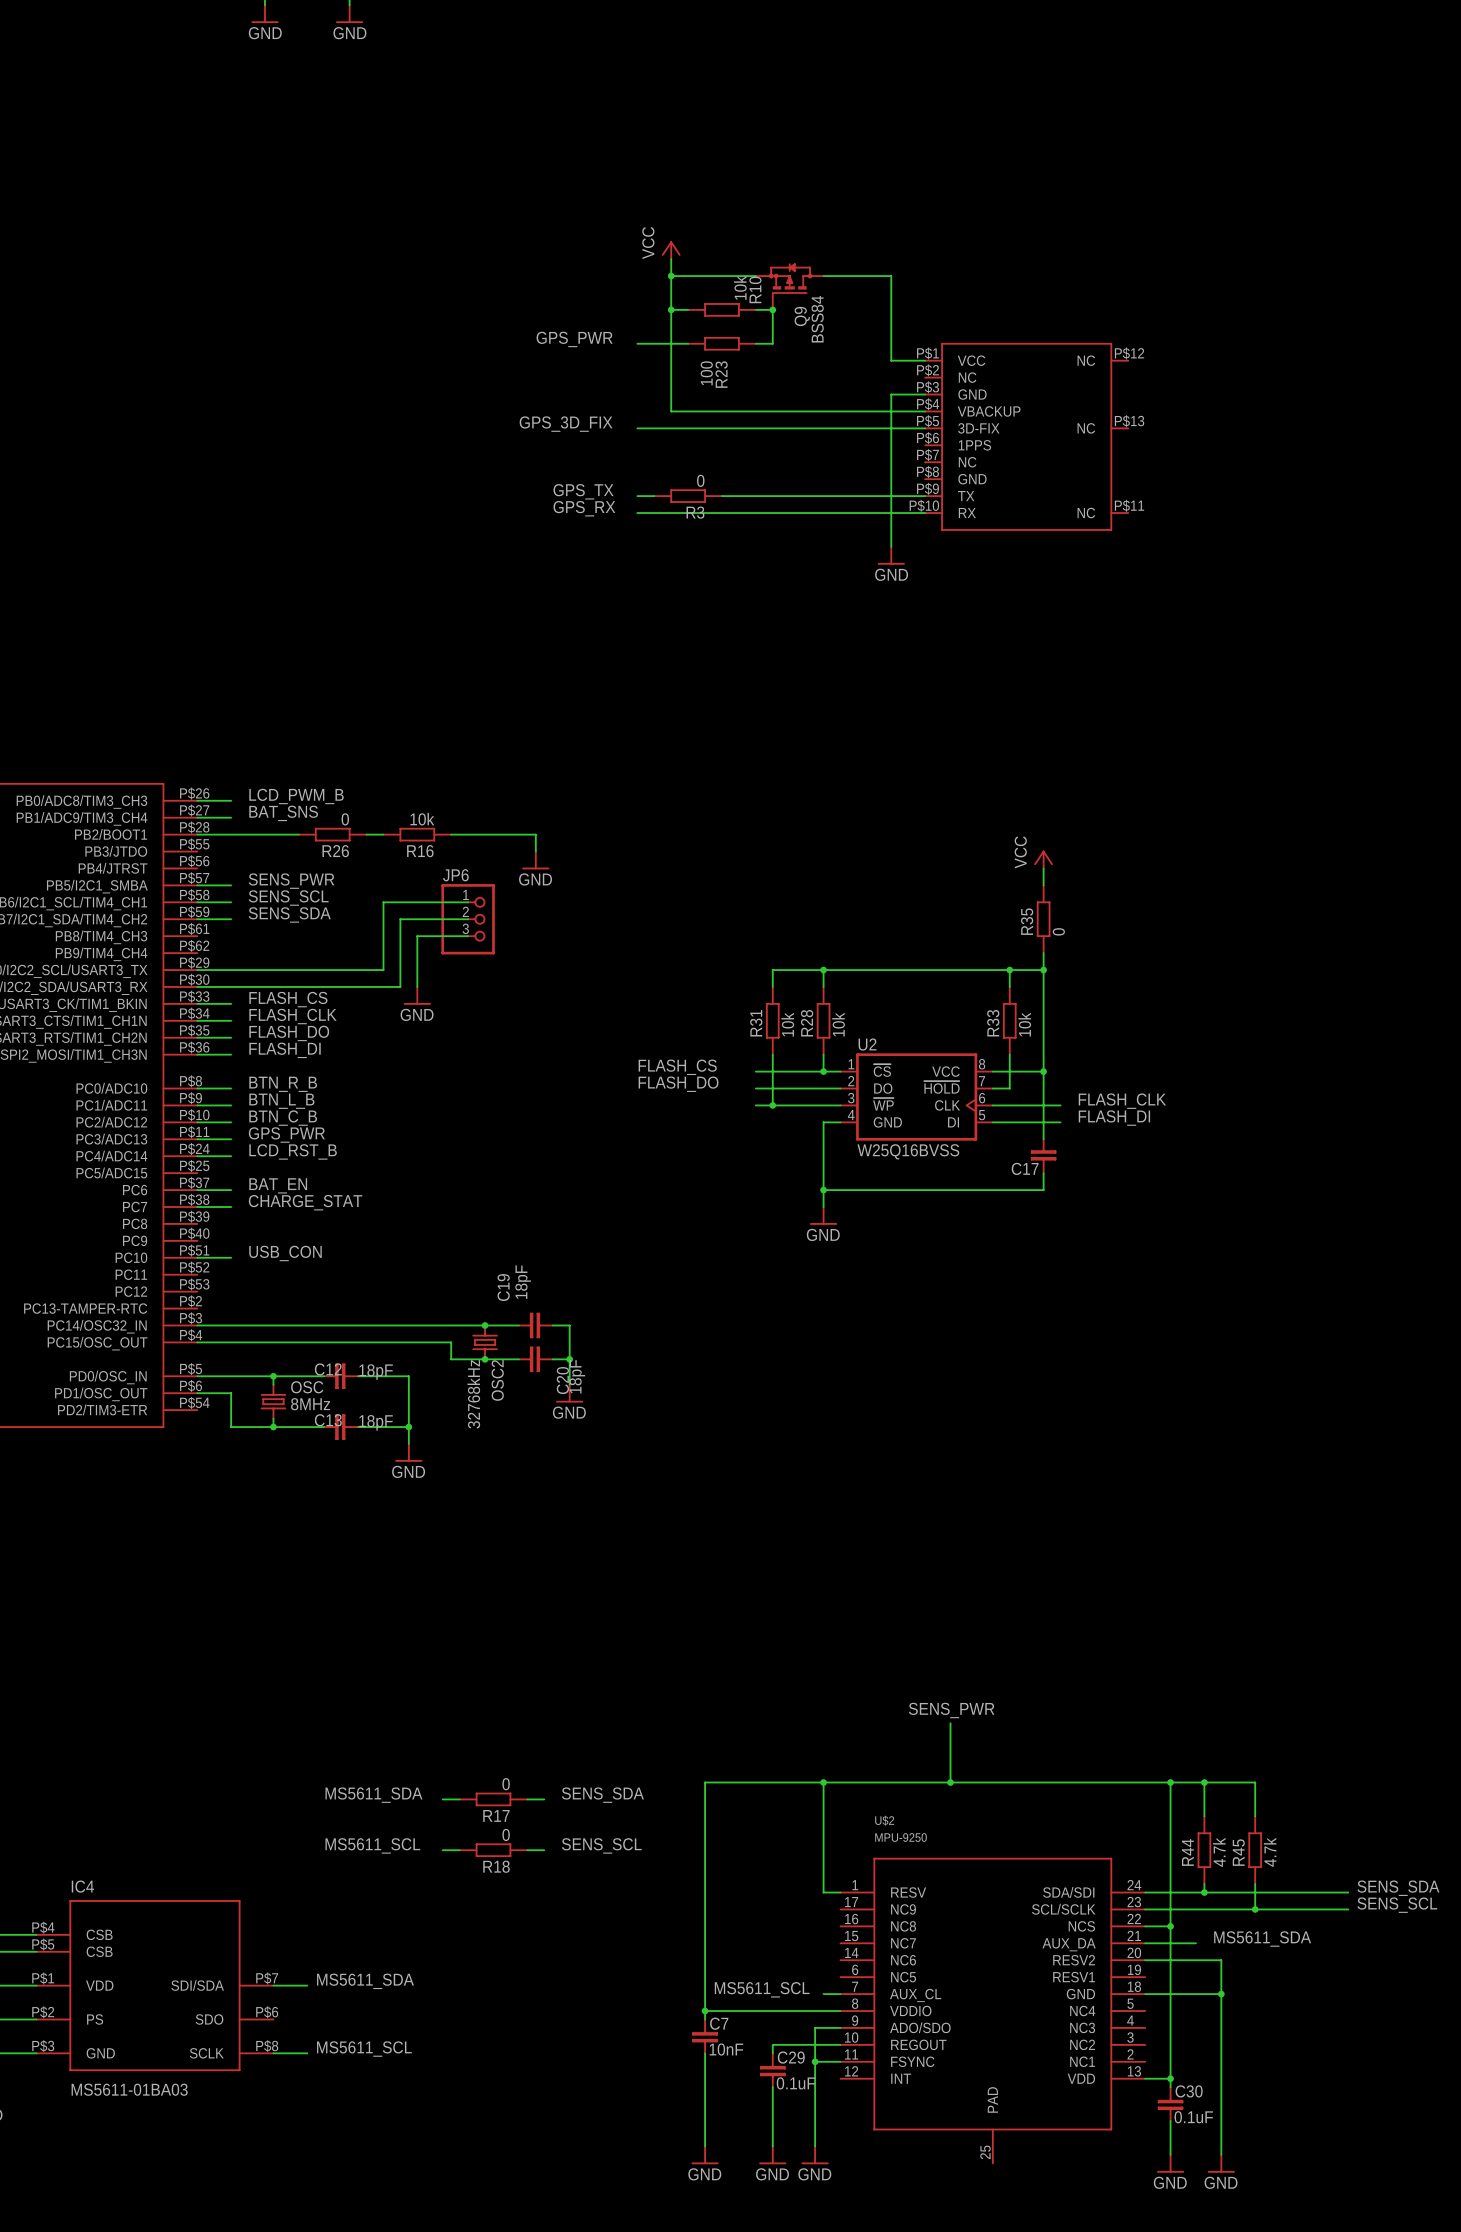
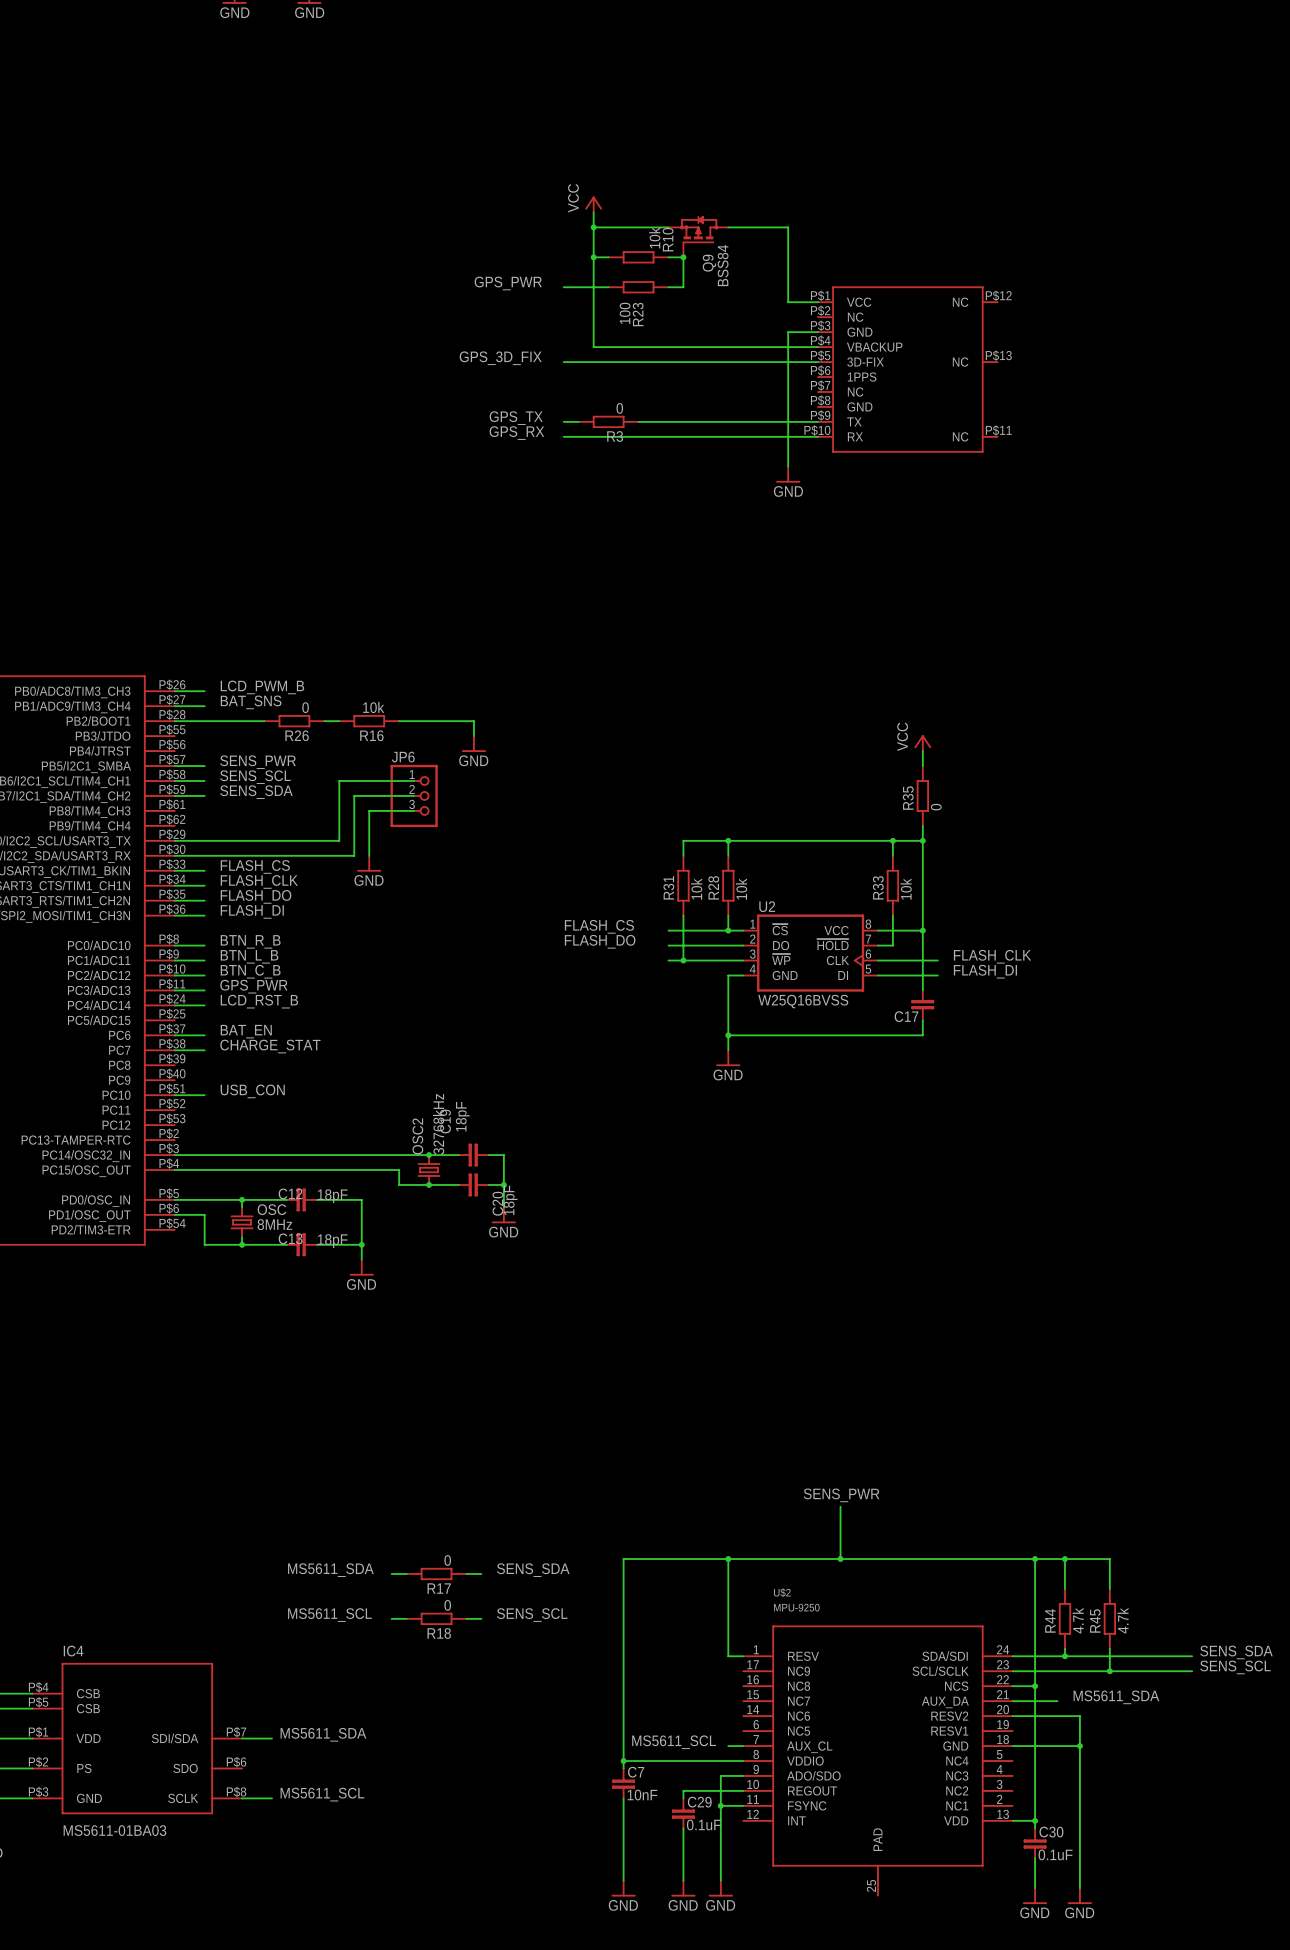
OSC2 name position: OSC2 (497, 1380) -> OSC2 (417, 1136)
OSC2 value position: 32768kHz (473, 1394) -> 32768kHz (438, 1124)

